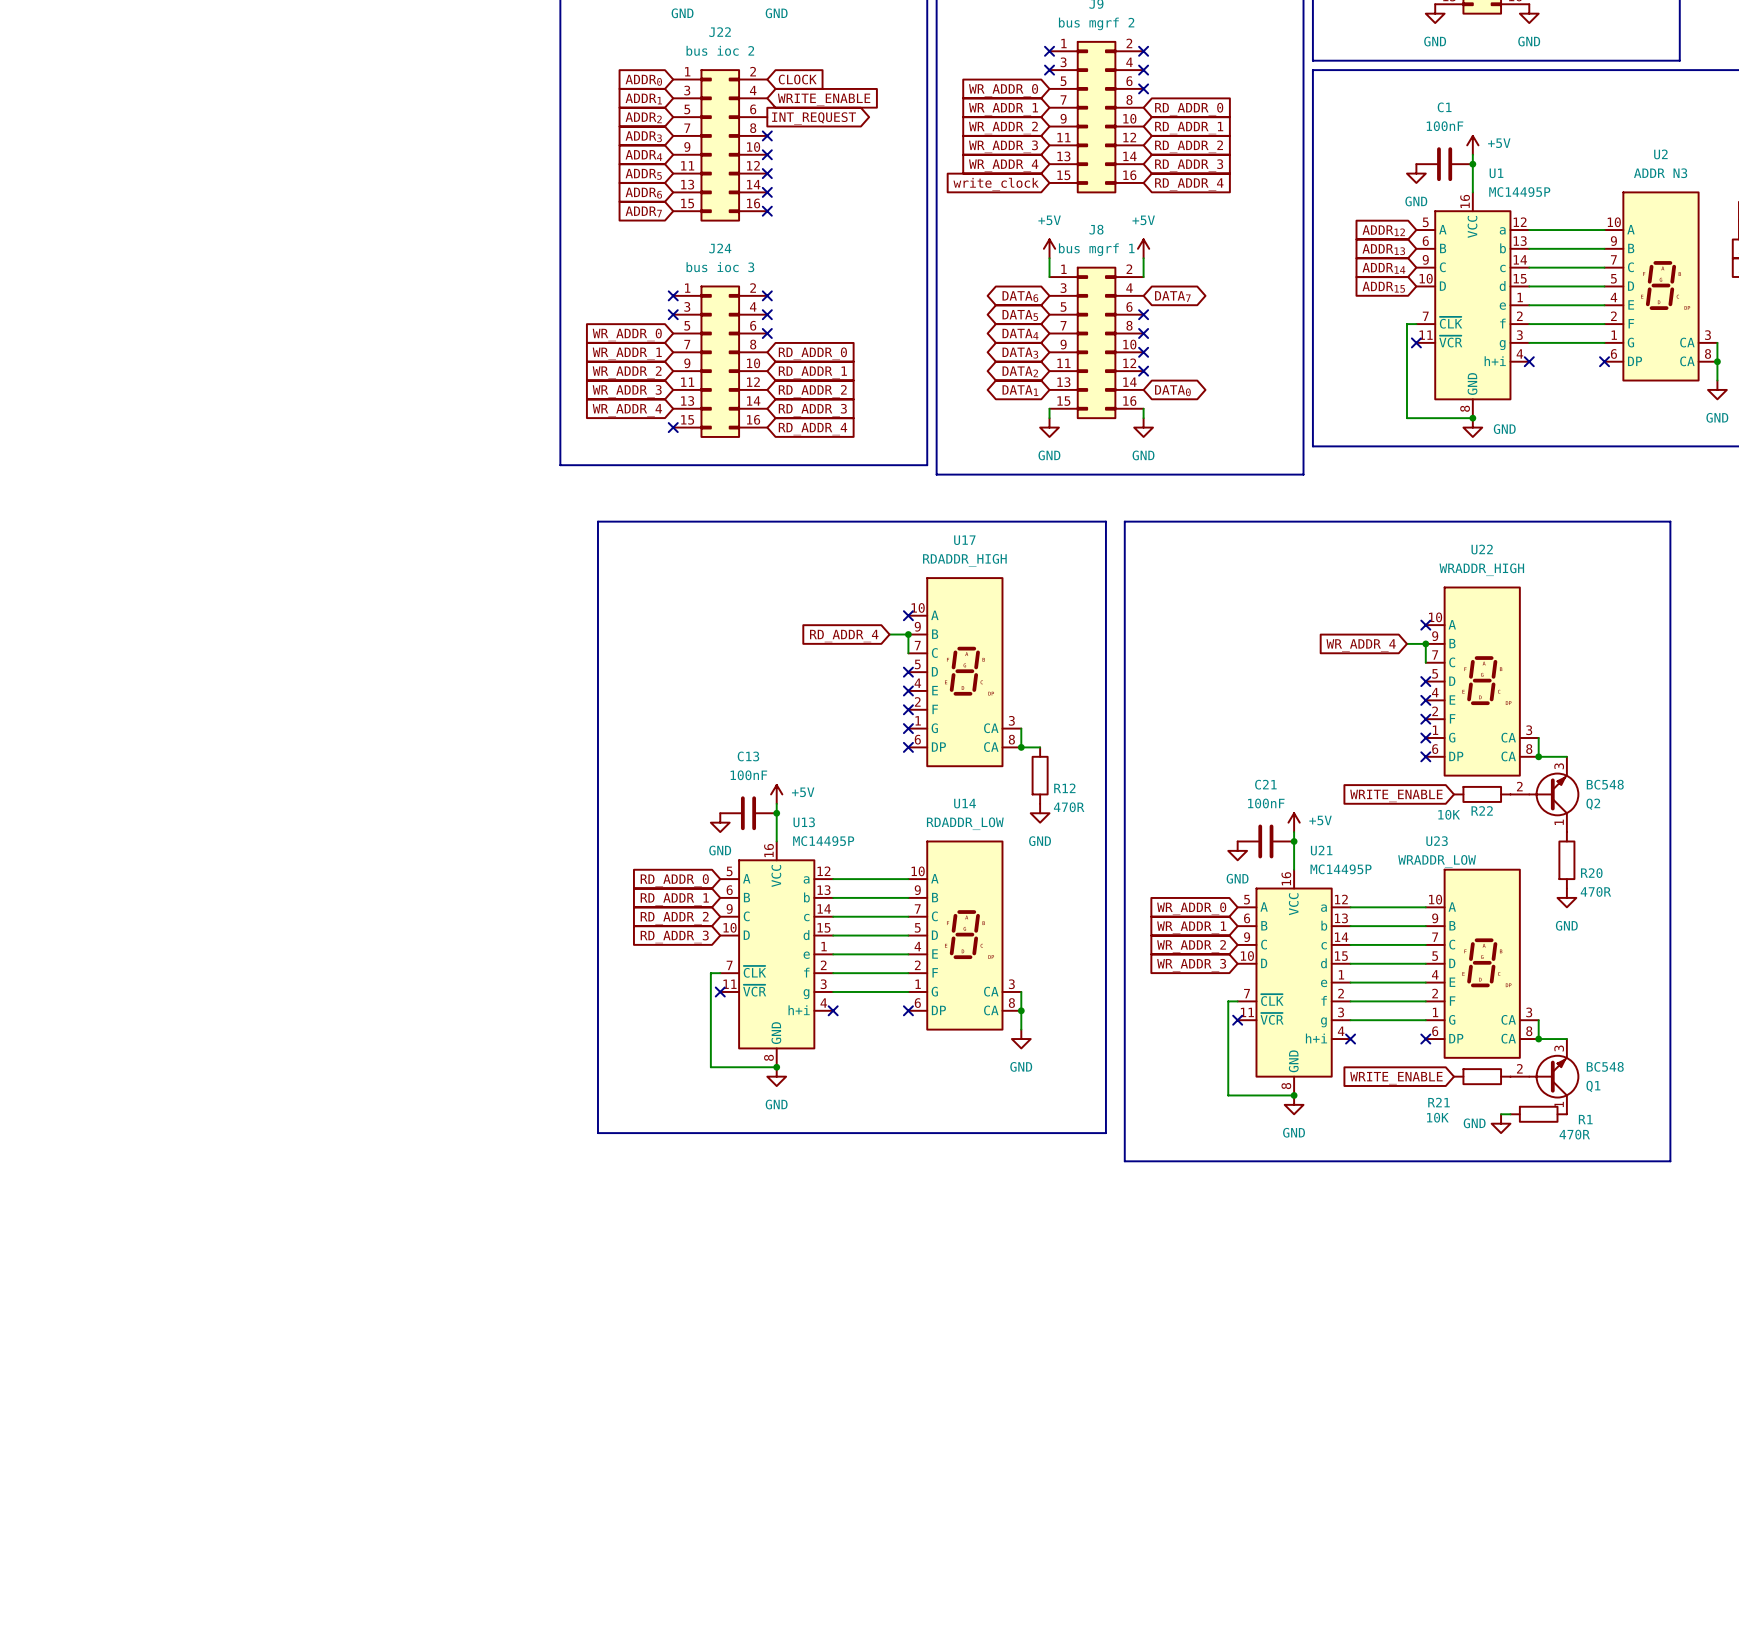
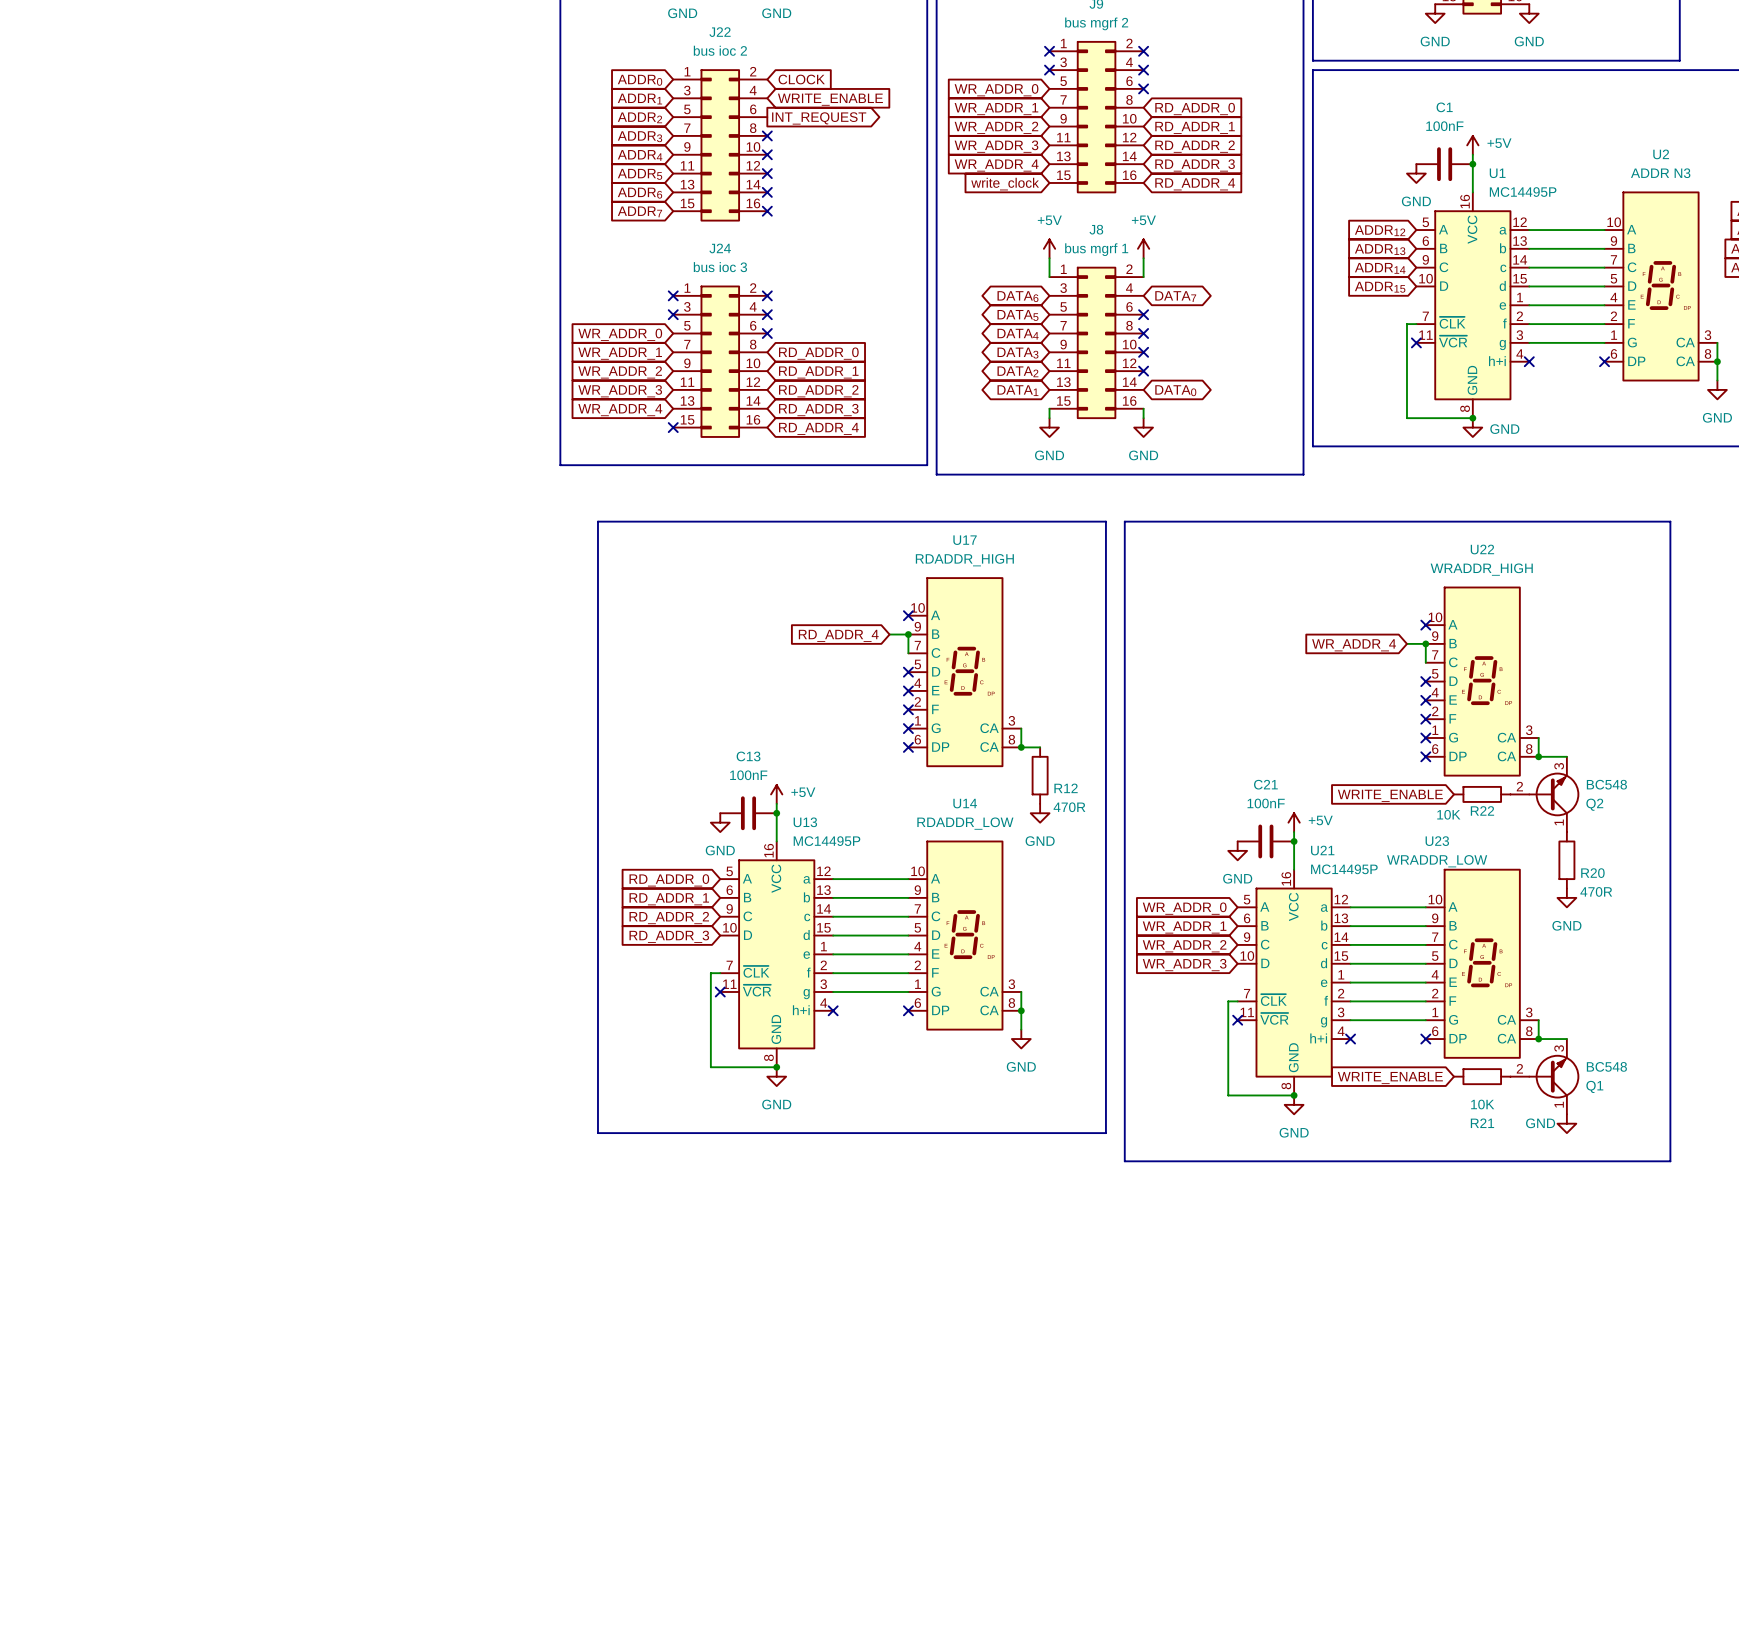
R21 name position: R21 (1438, 1102) -> R21 (1482, 1123)
wire: (1501, 1114) (1510, 1114) -> none
R1: 470R (1538, 1114) -> none
R21 value position: 10K (1437, 1117) -> 10K (1482, 1104)
power symbol position: GND (1501, 1123) -> GND (1566, 1123)

